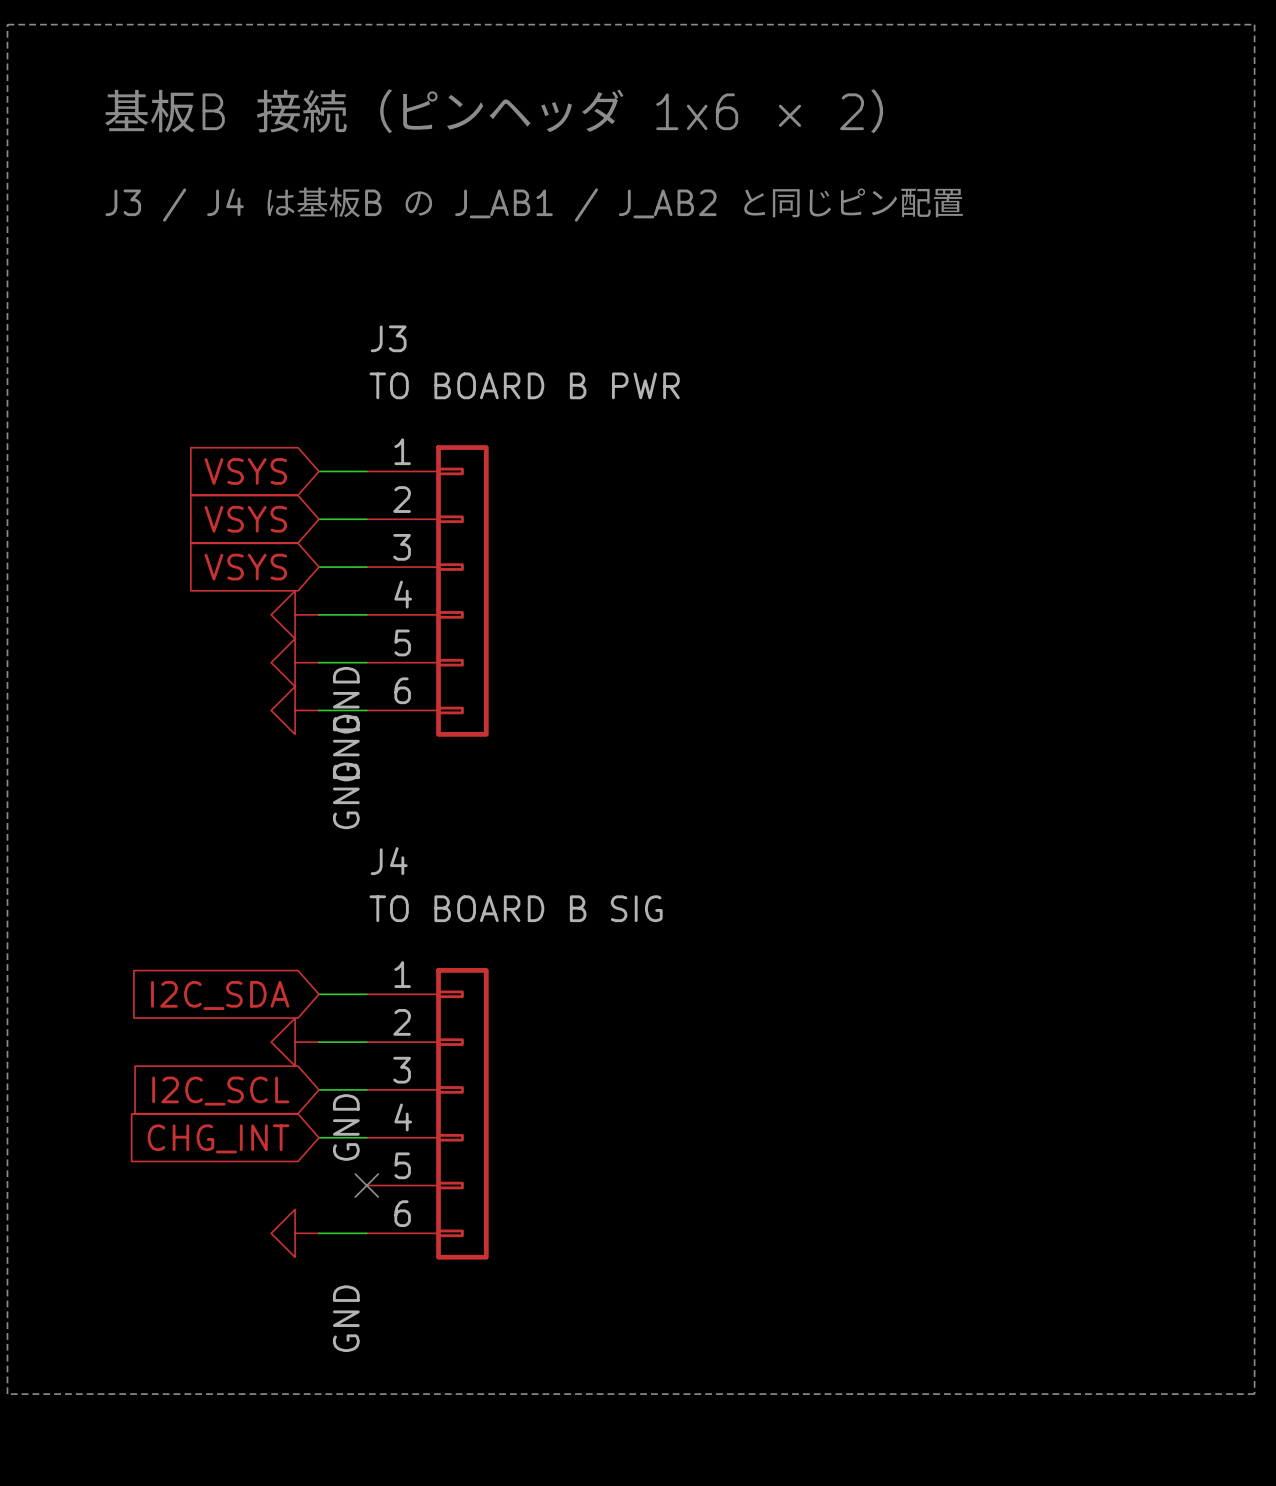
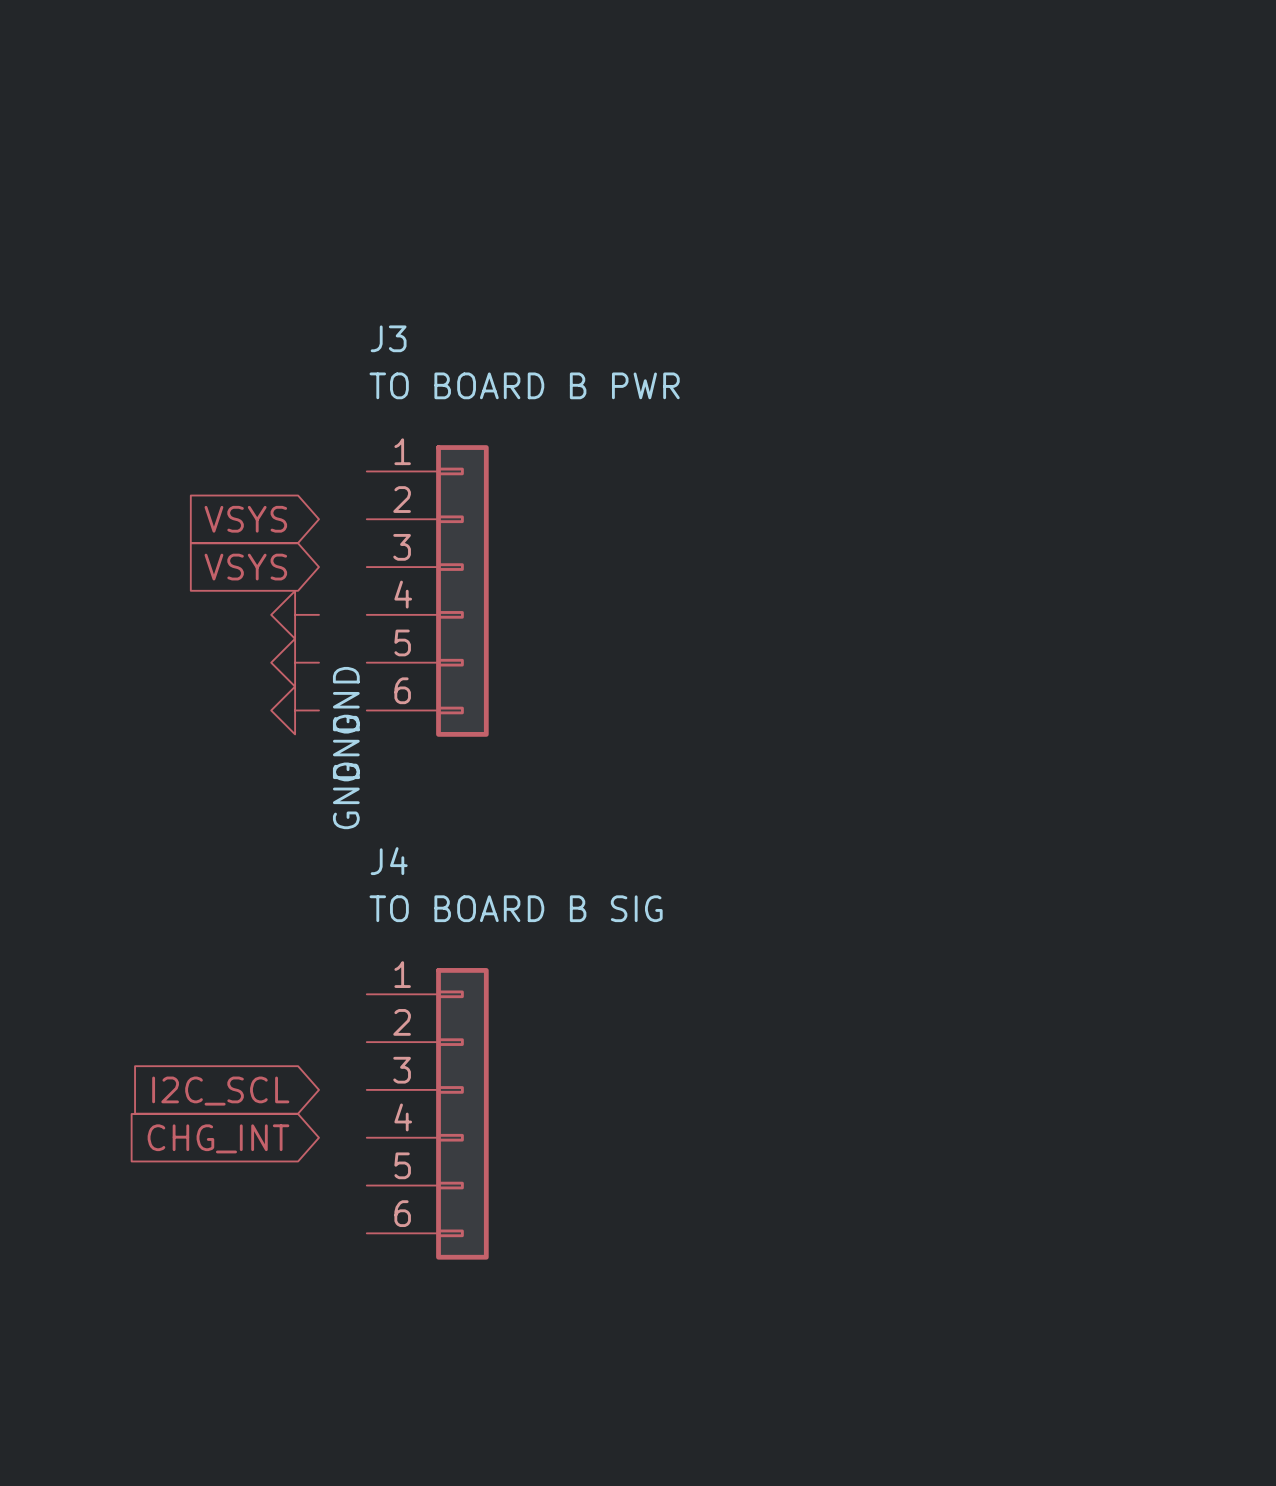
line: (7, 24) (1254, 24) (1254, 1394) (7, 1394) (7, 24) -> none
text: 基板B 接続（ピンヘッダ 1x6 × 2） (494, 111) -> none
text: J3 / J4 は基板B の J_AB1 / J_AB2 と同じピン配置 (534, 203) -> none
global label: VSYS (245, 471) -> none
wire: (318, 471) (366, 471) -> none
wire: (318, 519) (366, 519) -> none
wire: (318, 567) (366, 567) -> none
wire: (318, 614) (366, 614) -> none
wire: (318, 662) (366, 662) -> none
wire: (318, 710) (366, 710) -> none
wire: (318, 994) (366, 994) -> none
global label: I2C_SDA (220, 995) -> none
power symbol: GND (295, 1042) -> none
wire: (318, 1042) (366, 1042) -> none
wire: (318, 1089) (366, 1089) -> none
wire: (318, 1137) (366, 1137) -> none
no-connect mark: (366, 1185) -> none
power symbol: GND (295, 1233) -> none
wire: (318, 1233) (366, 1233) -> none

